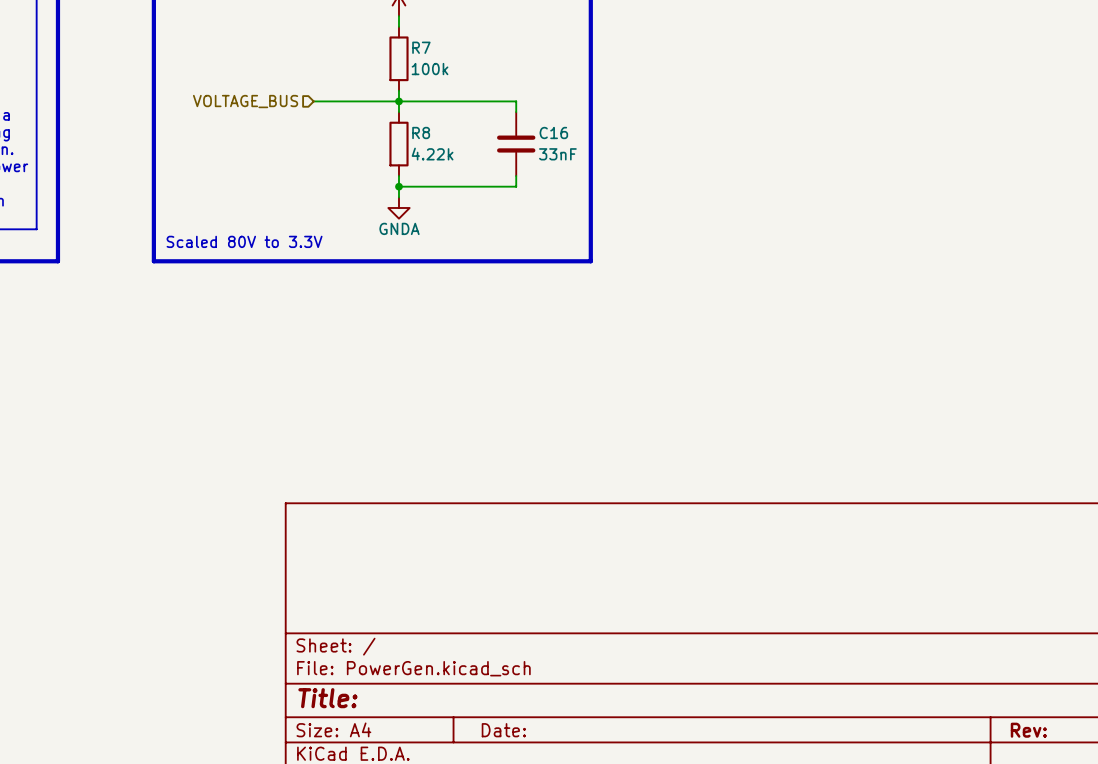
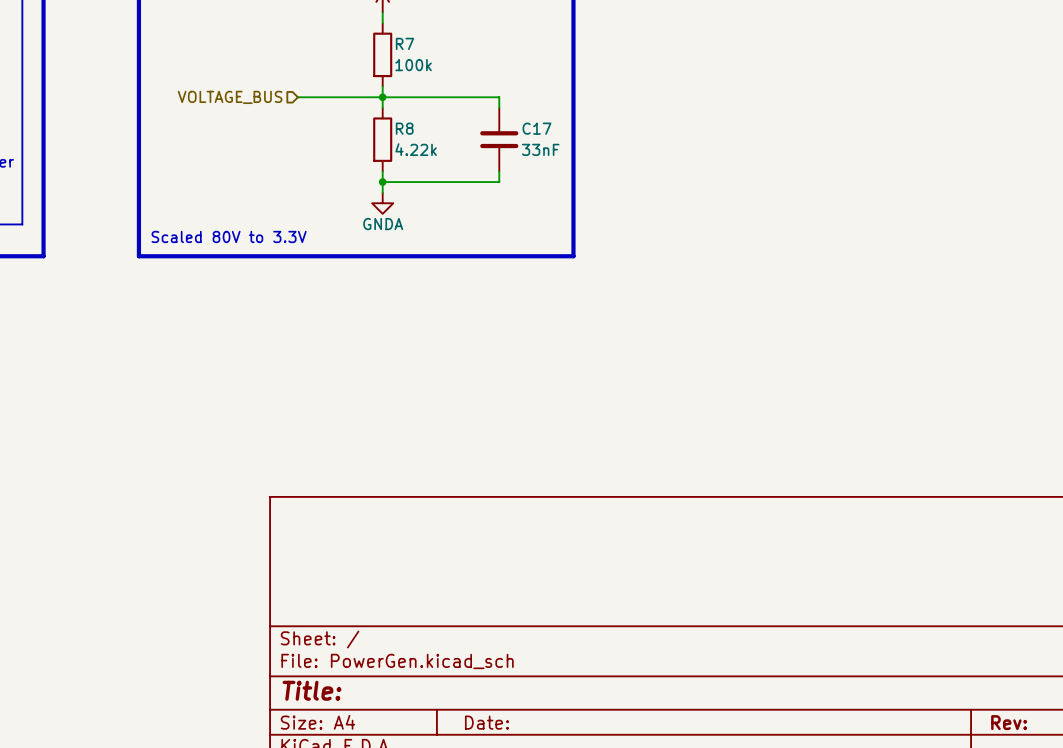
C16 name: C16 (553, 132) -> C17 (536, 128)

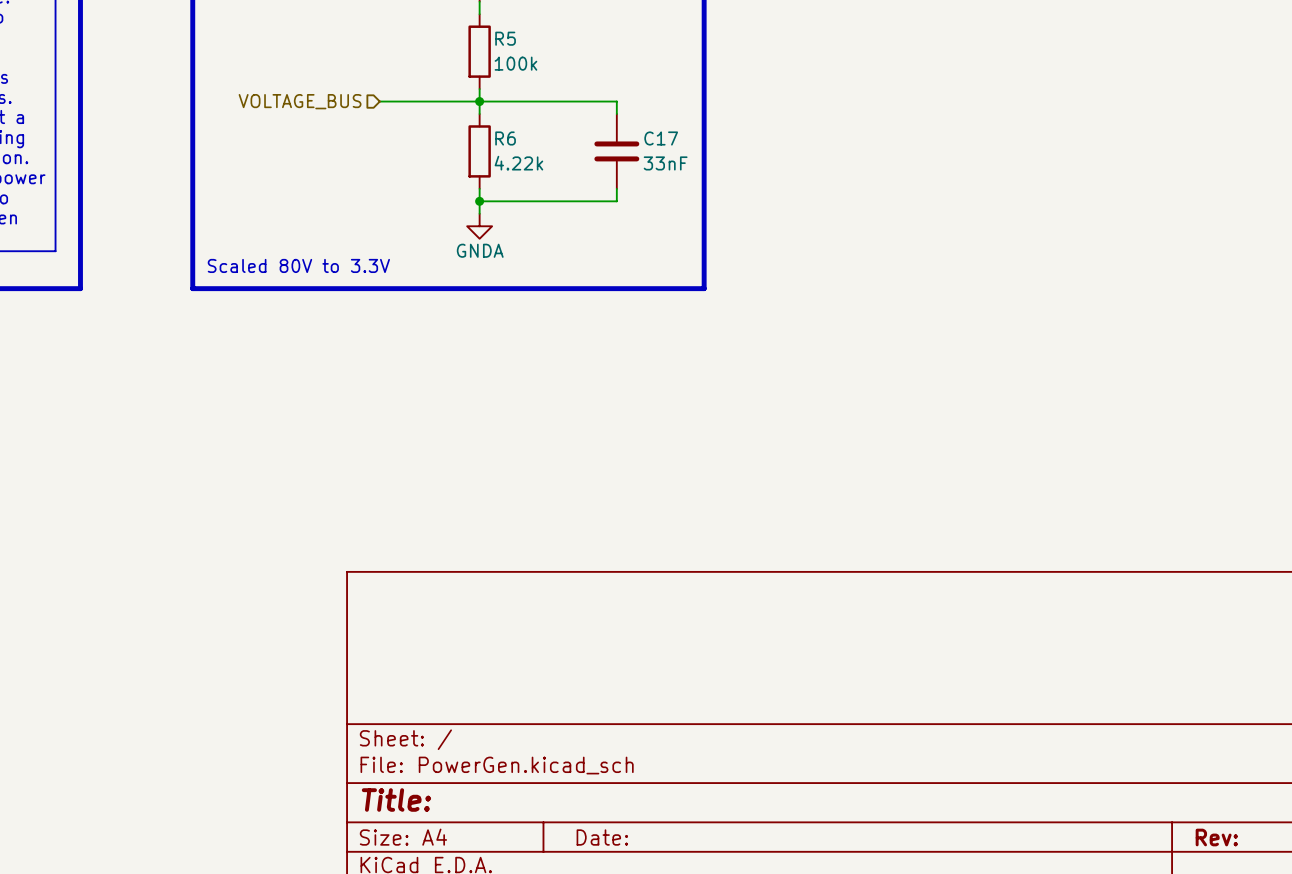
R7 name: R7 (404, 43) -> R5 (505, 38)
R8 name: R8 (404, 128) -> R6 (505, 138)

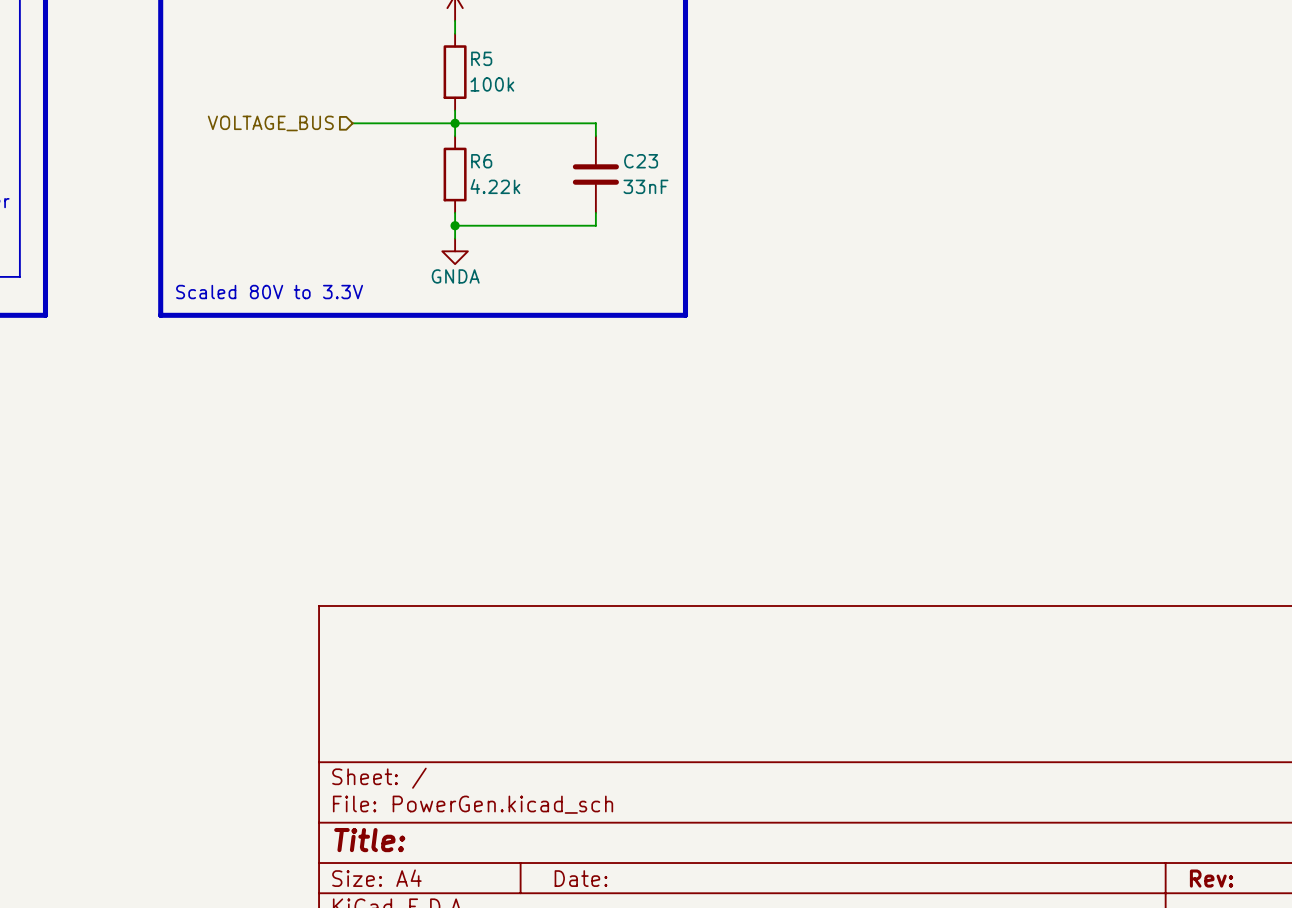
C17 name: C17 (661, 138) -> C23 (641, 161)

